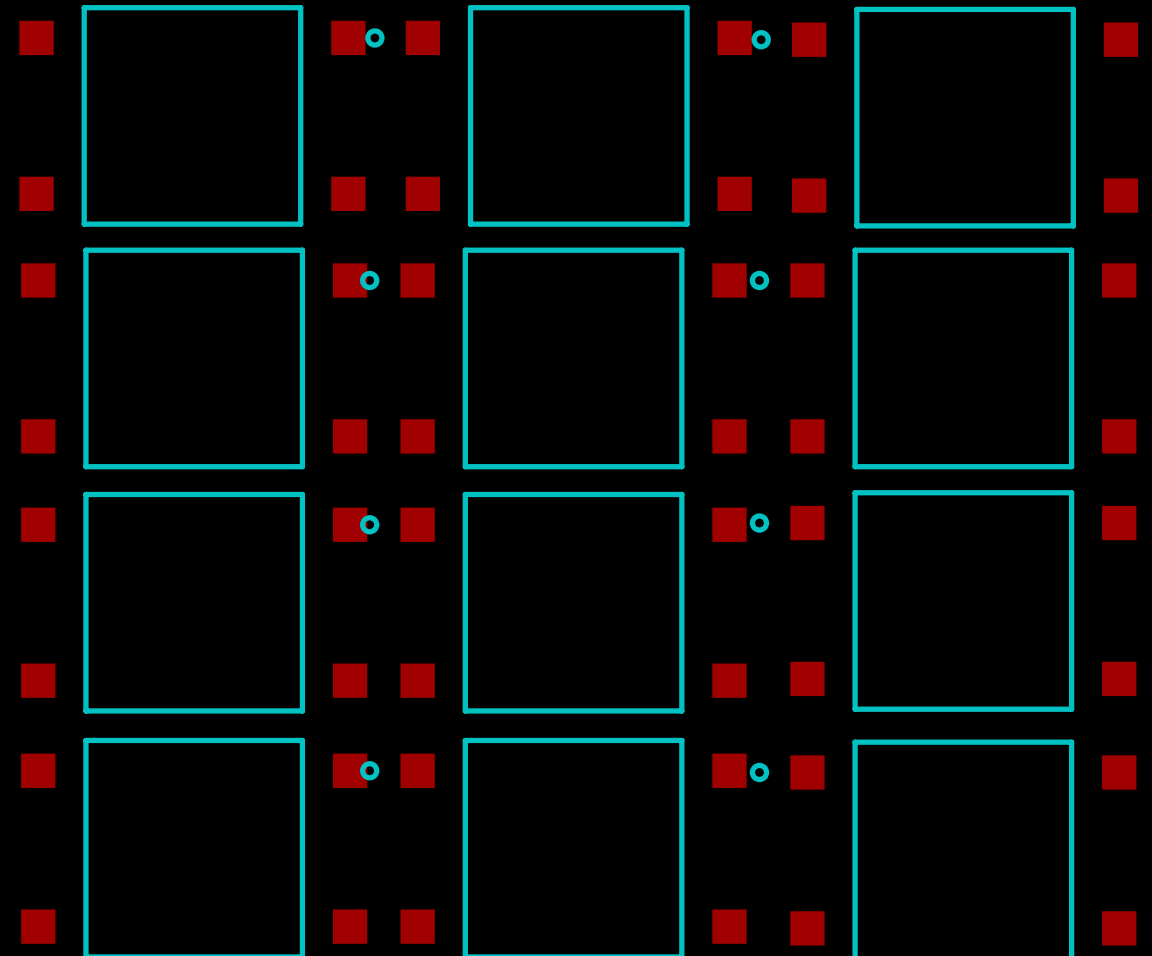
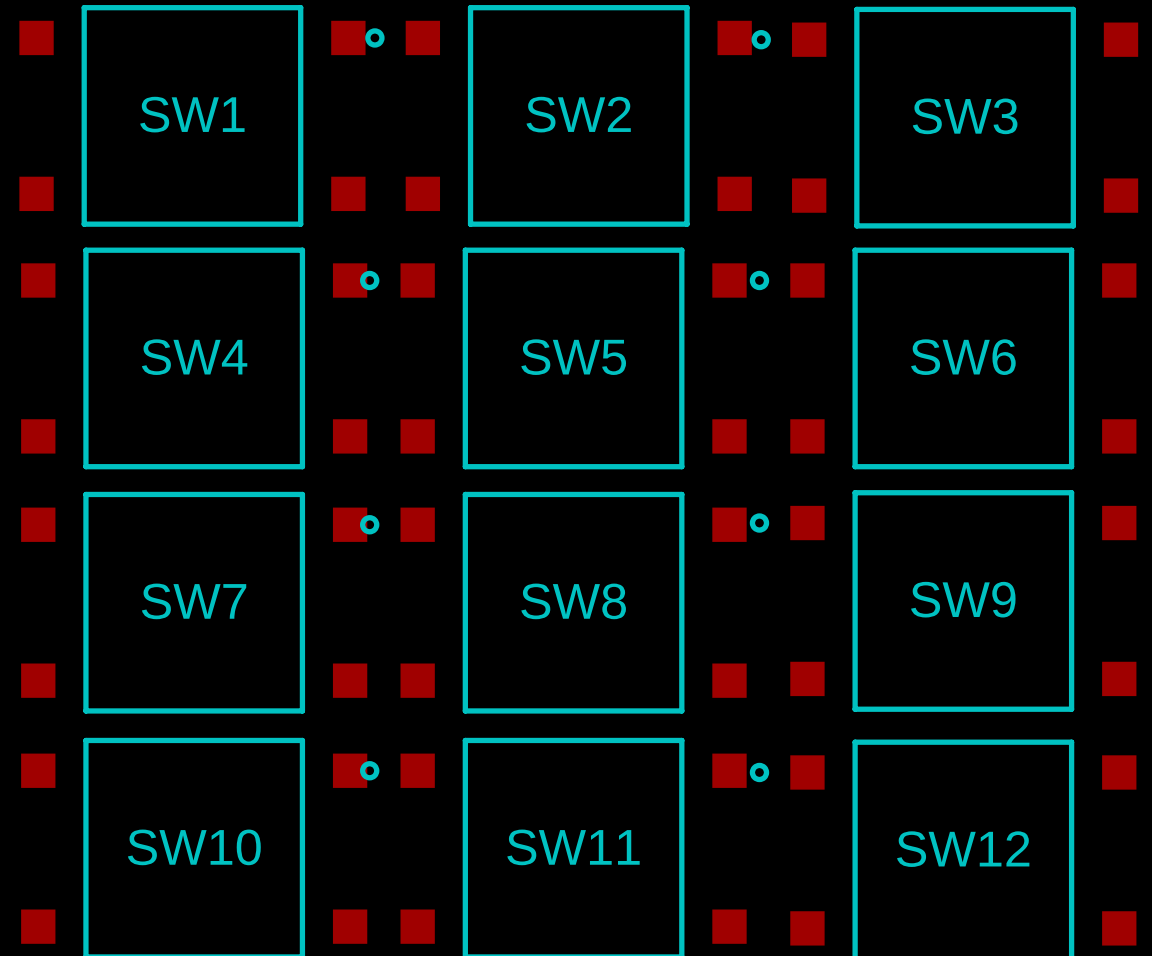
SW1 name: none -> SW1 (192, 114)
SW2 name: none -> SW2 (578, 114)
SW3 name: none -> SW3 (965, 116)
SW4 name: none -> SW4 (194, 357)
SW5 name: none -> SW5 (573, 357)
SW6 name: none -> SW6 (963, 357)
SW9 name: none -> SW9 (963, 599)
SW7 name: none -> SW7 (194, 601)
SW8 name: none -> SW8 (573, 601)
SW10 name: none -> SW10 (194, 847)
SW11 name: none -> SW11 (573, 847)
SW12 name: none -> SW12 (963, 849)

